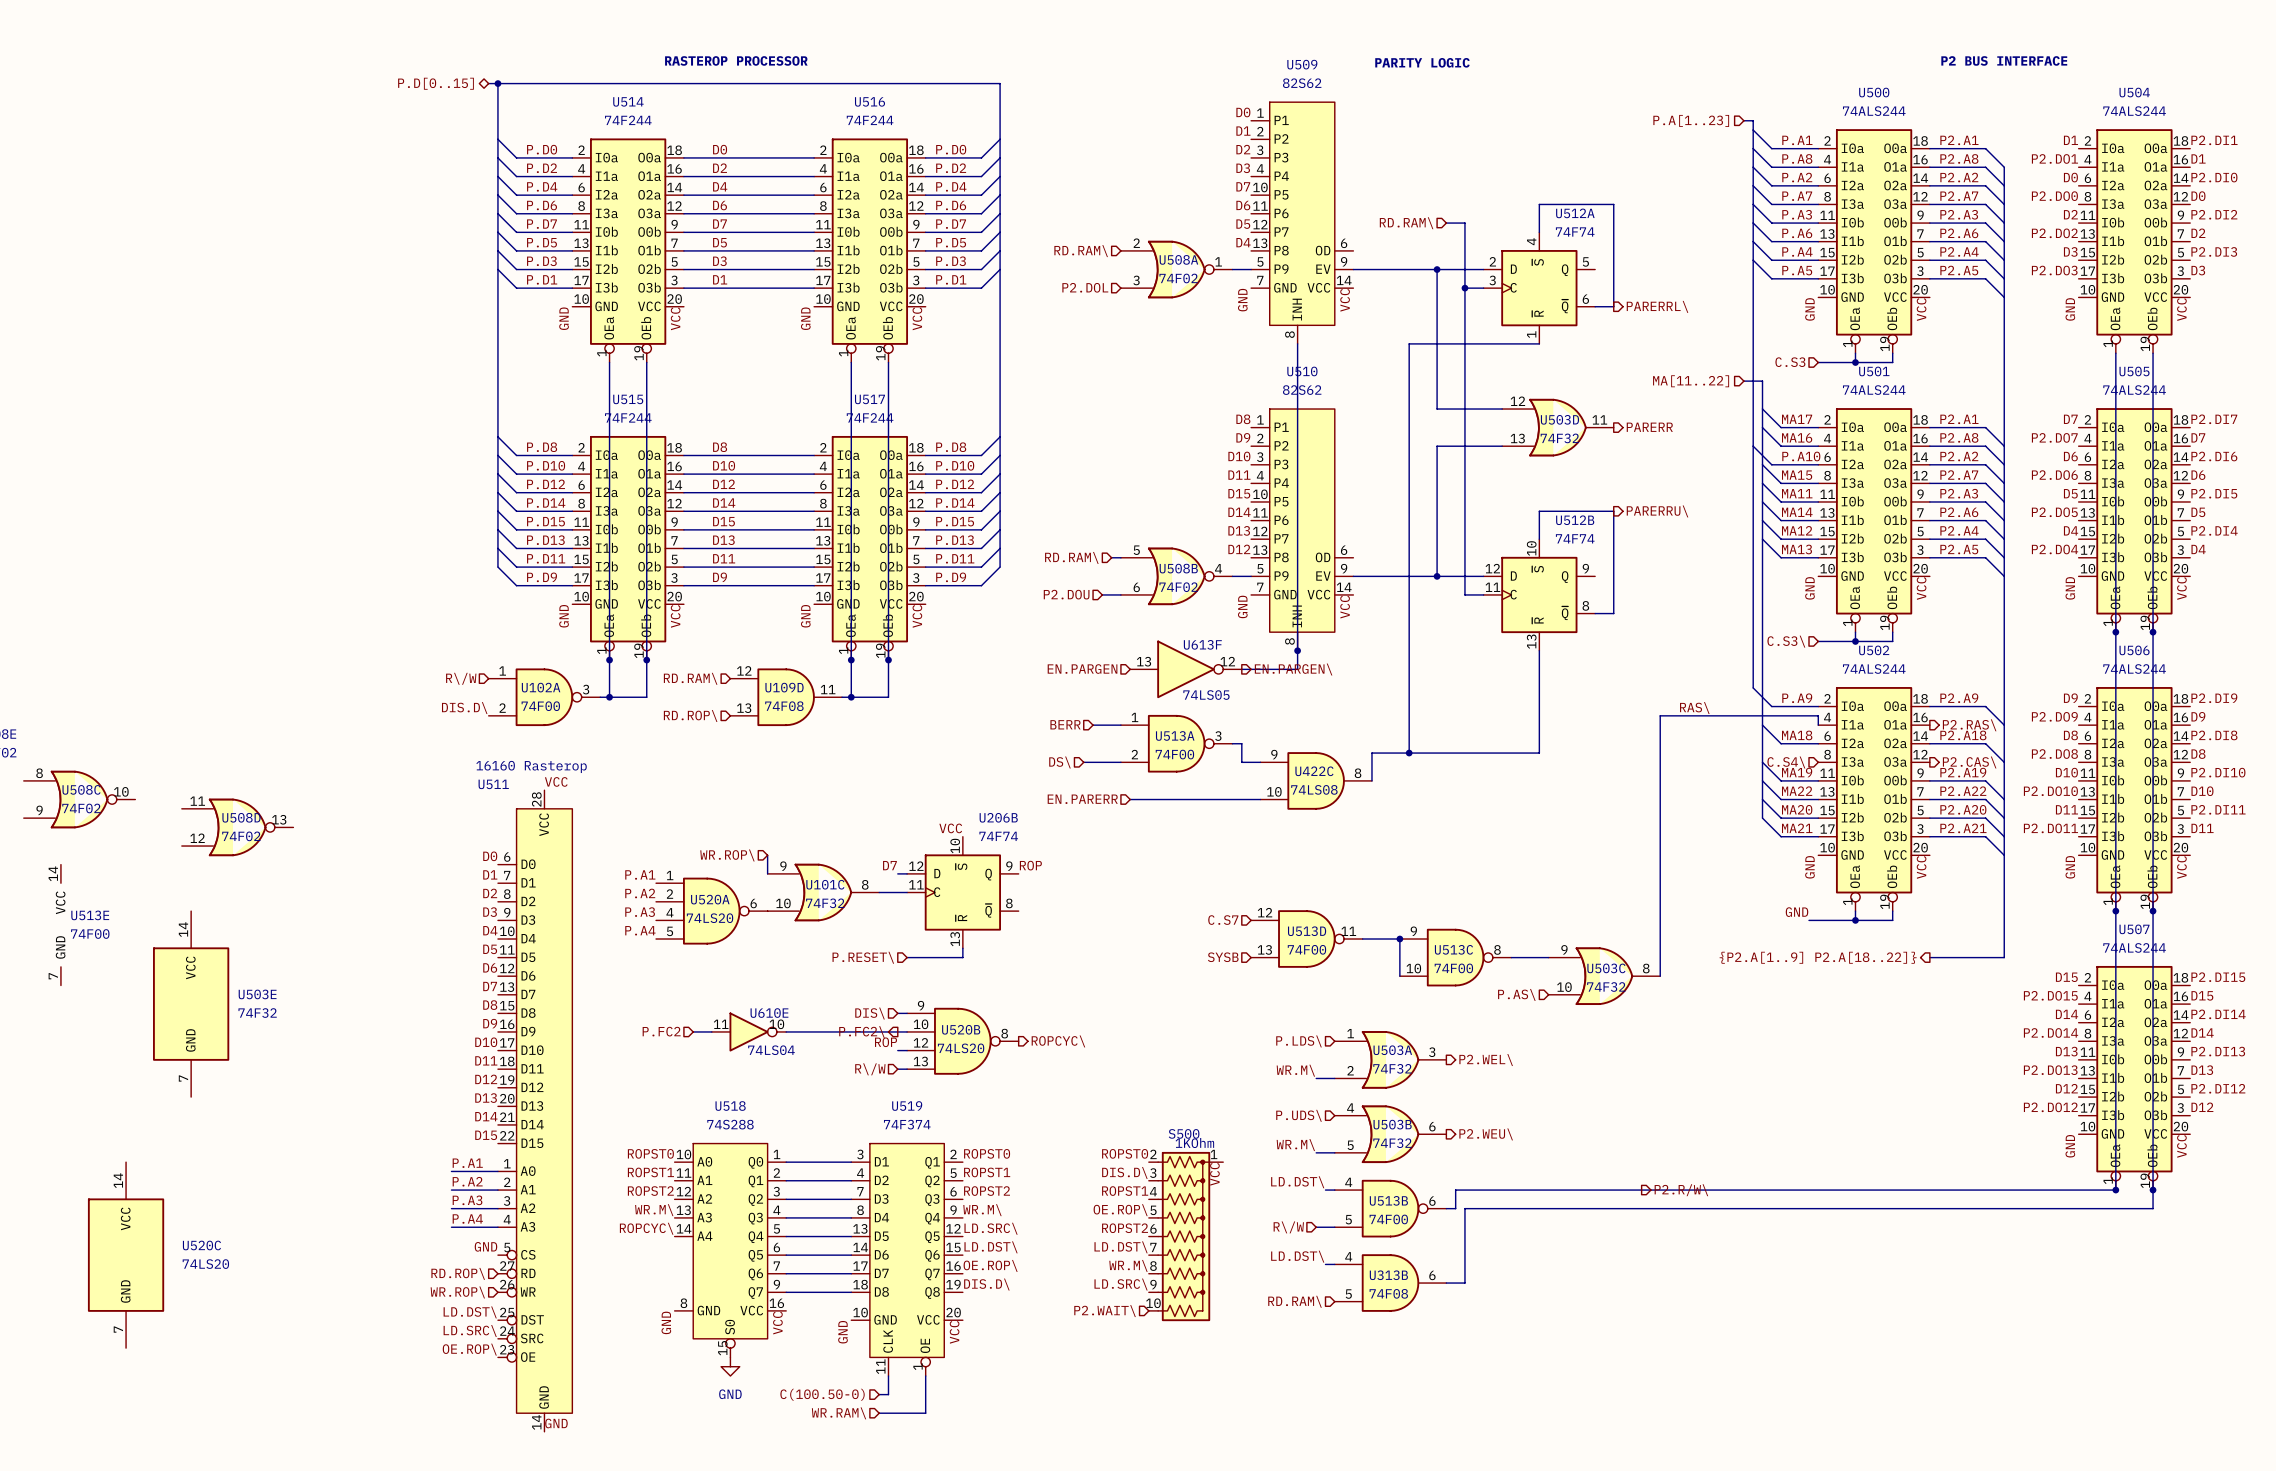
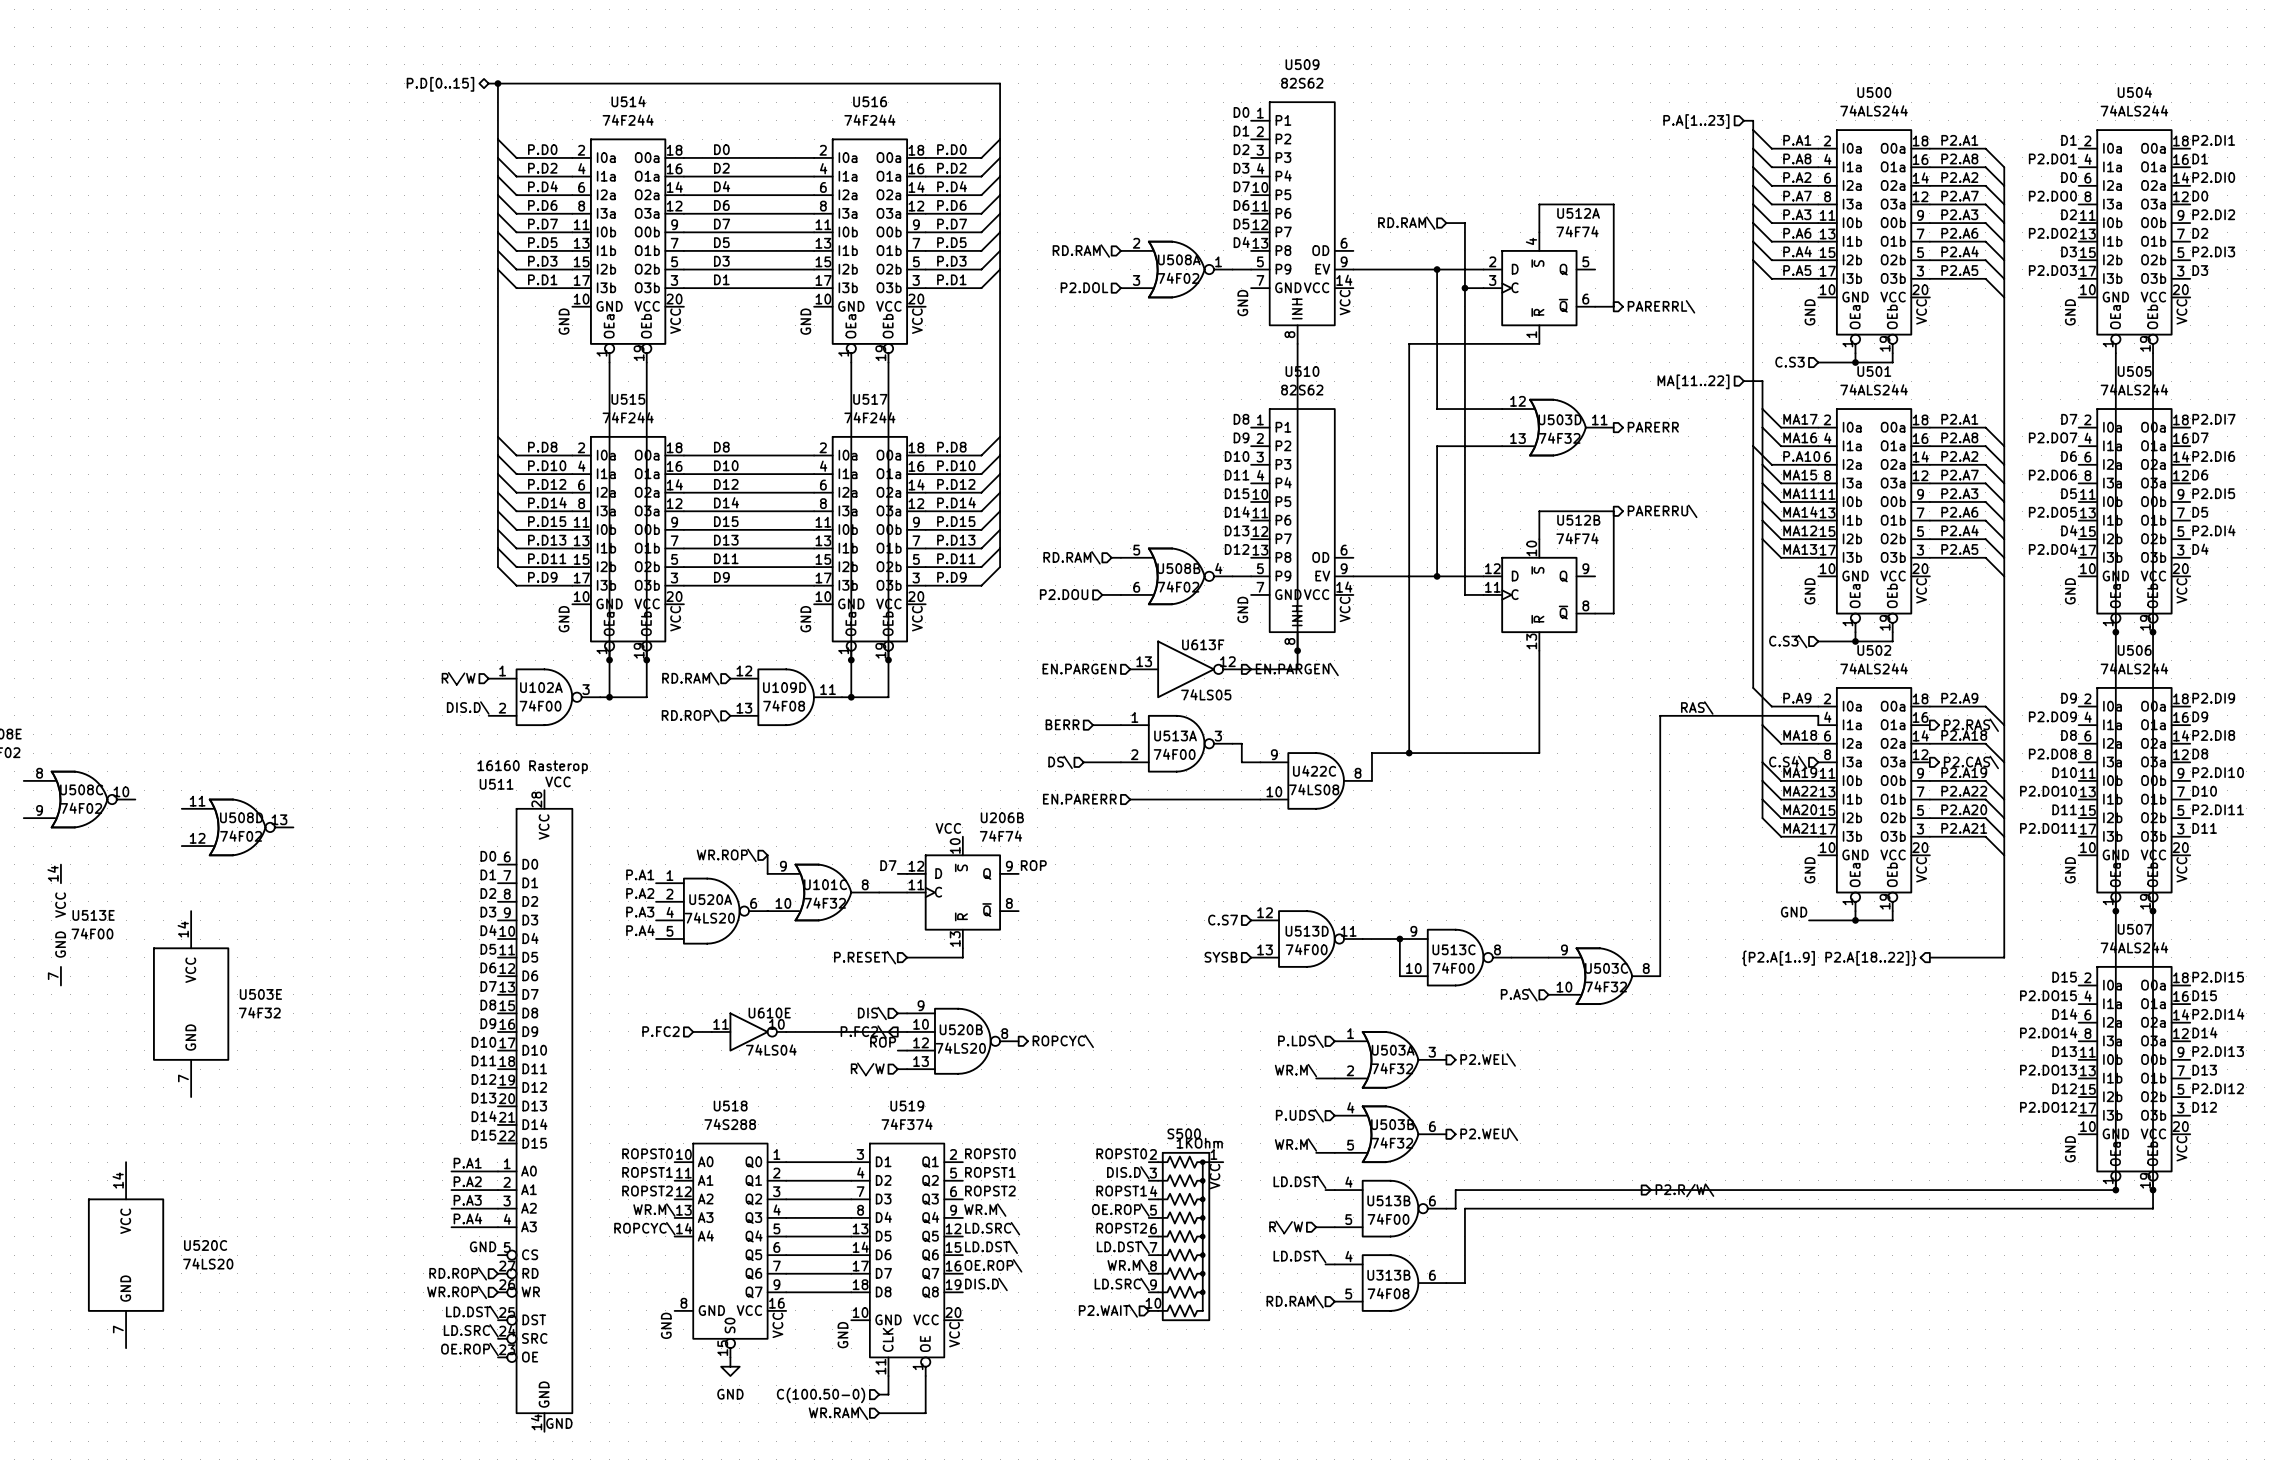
text: RASTEROP PROCESSOR (736, 60) -> none
text: P2 BUS INTERFACE (2004, 60) -> none
text: PARITY LOGIC (1422, 62) -> none

